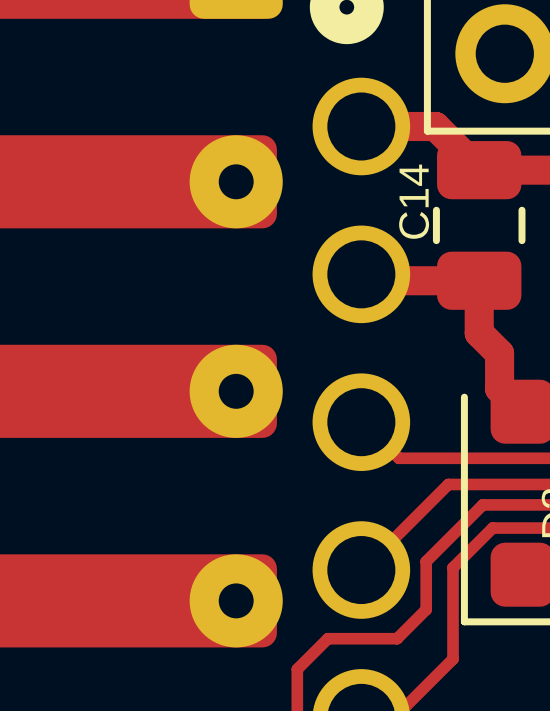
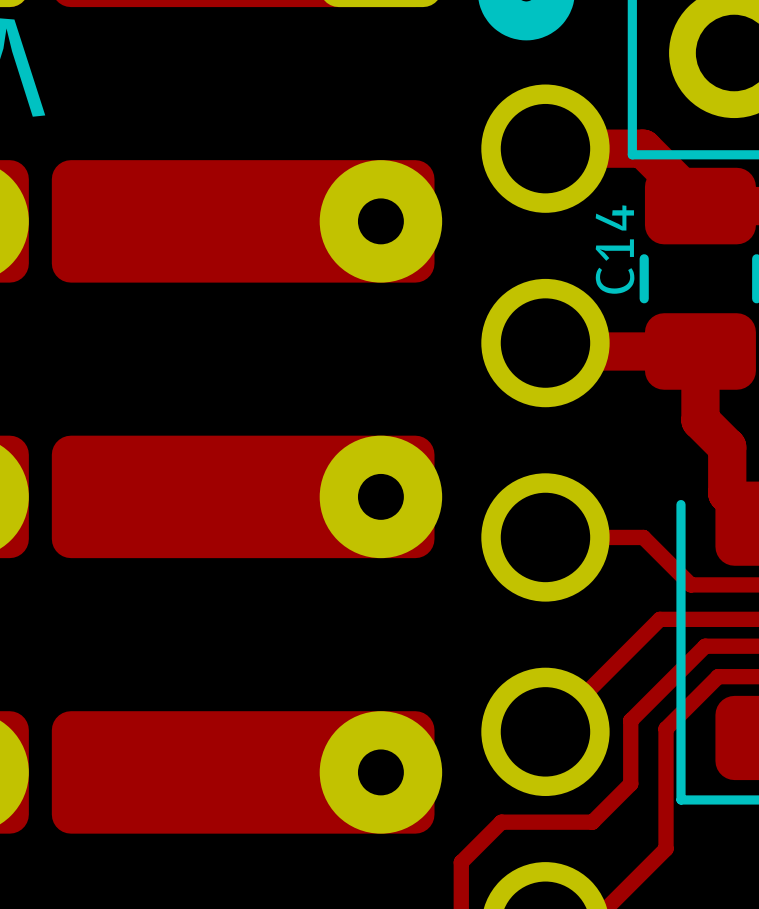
track: (362, 422) (398, 458) (471, 458) -> (545, 537) (643, 537) (690, 584)

